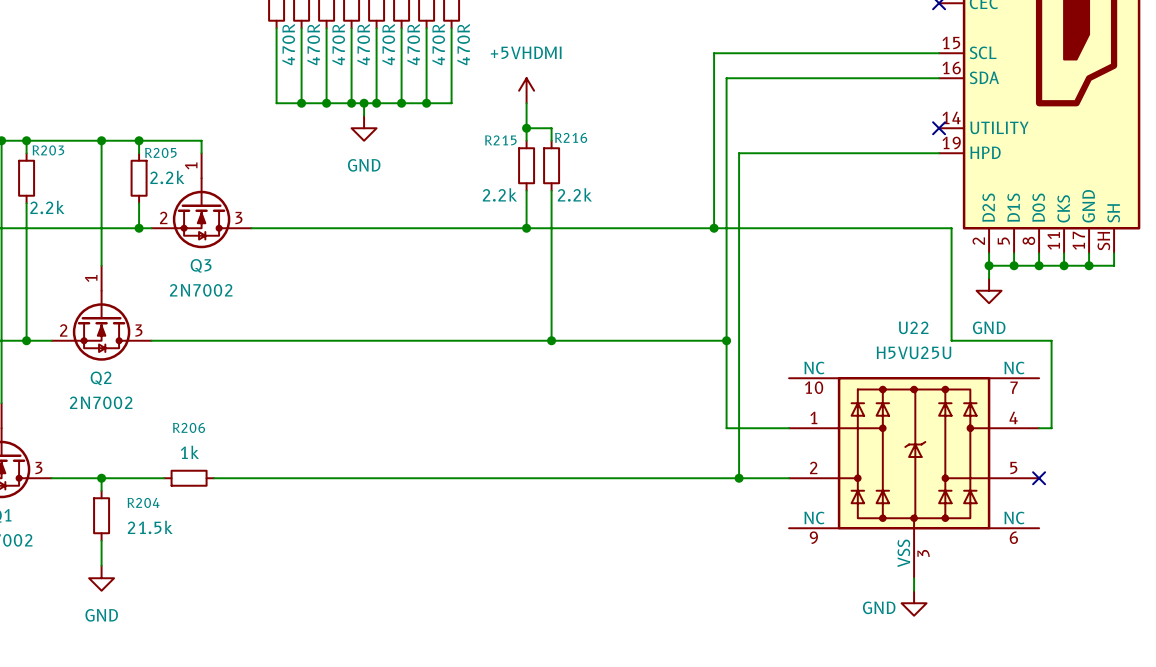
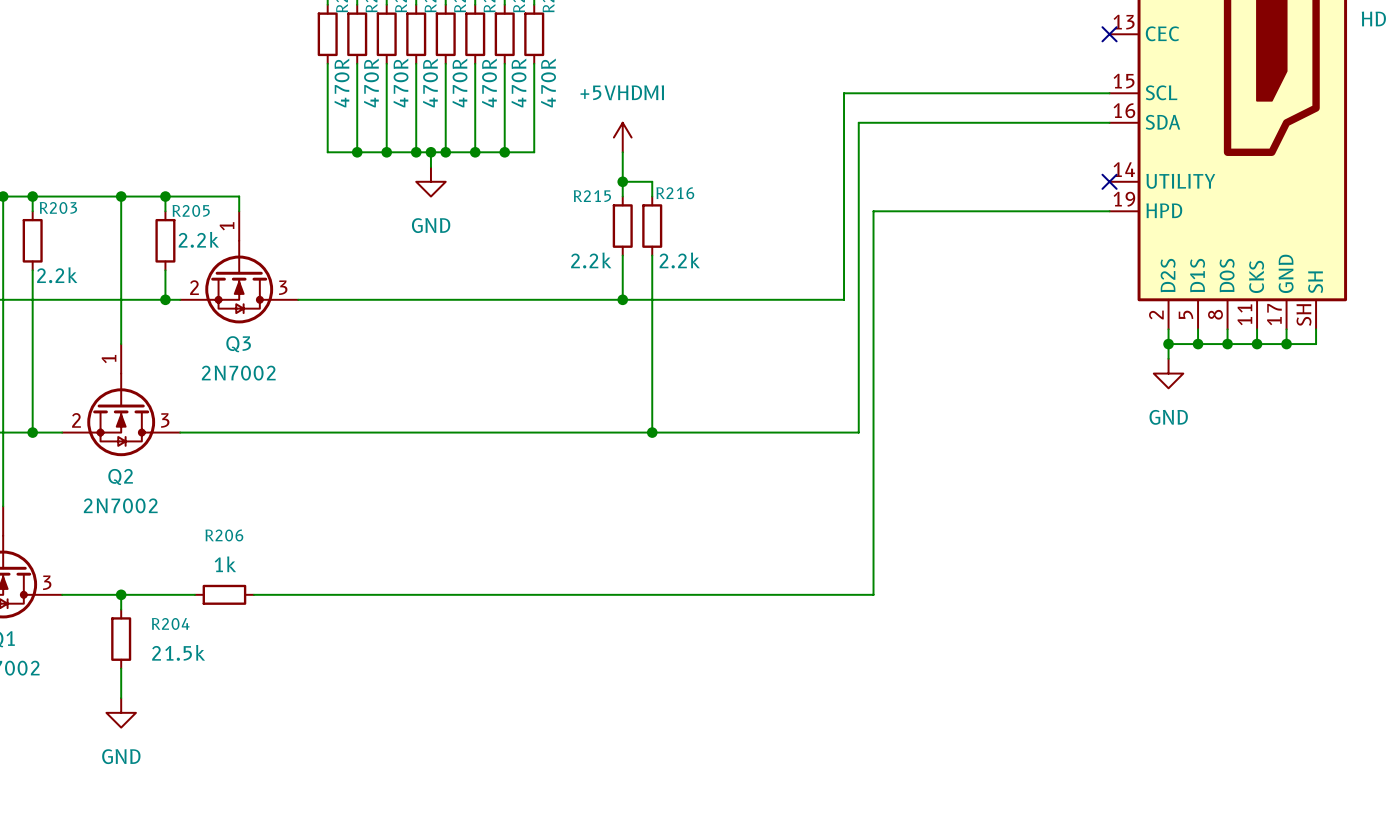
wire: (714, 228) (951, 228) (951, 340) (1051, 340) (1051, 428) (1039, 428) -> none
junction: (714, 228) -> none
wire: (726, 340) (726, 428) (789, 428) -> none
junction: (726, 340) -> none
U22: H5VU25U (914, 477) -> none
wire: (739, 478) (789, 478) -> none
junction: (739, 478) -> none
no-connect mark: (1039, 478) -> none
wire: (914, 578) (914, 590) -> none
power symbol: GND (914, 603) -> none

